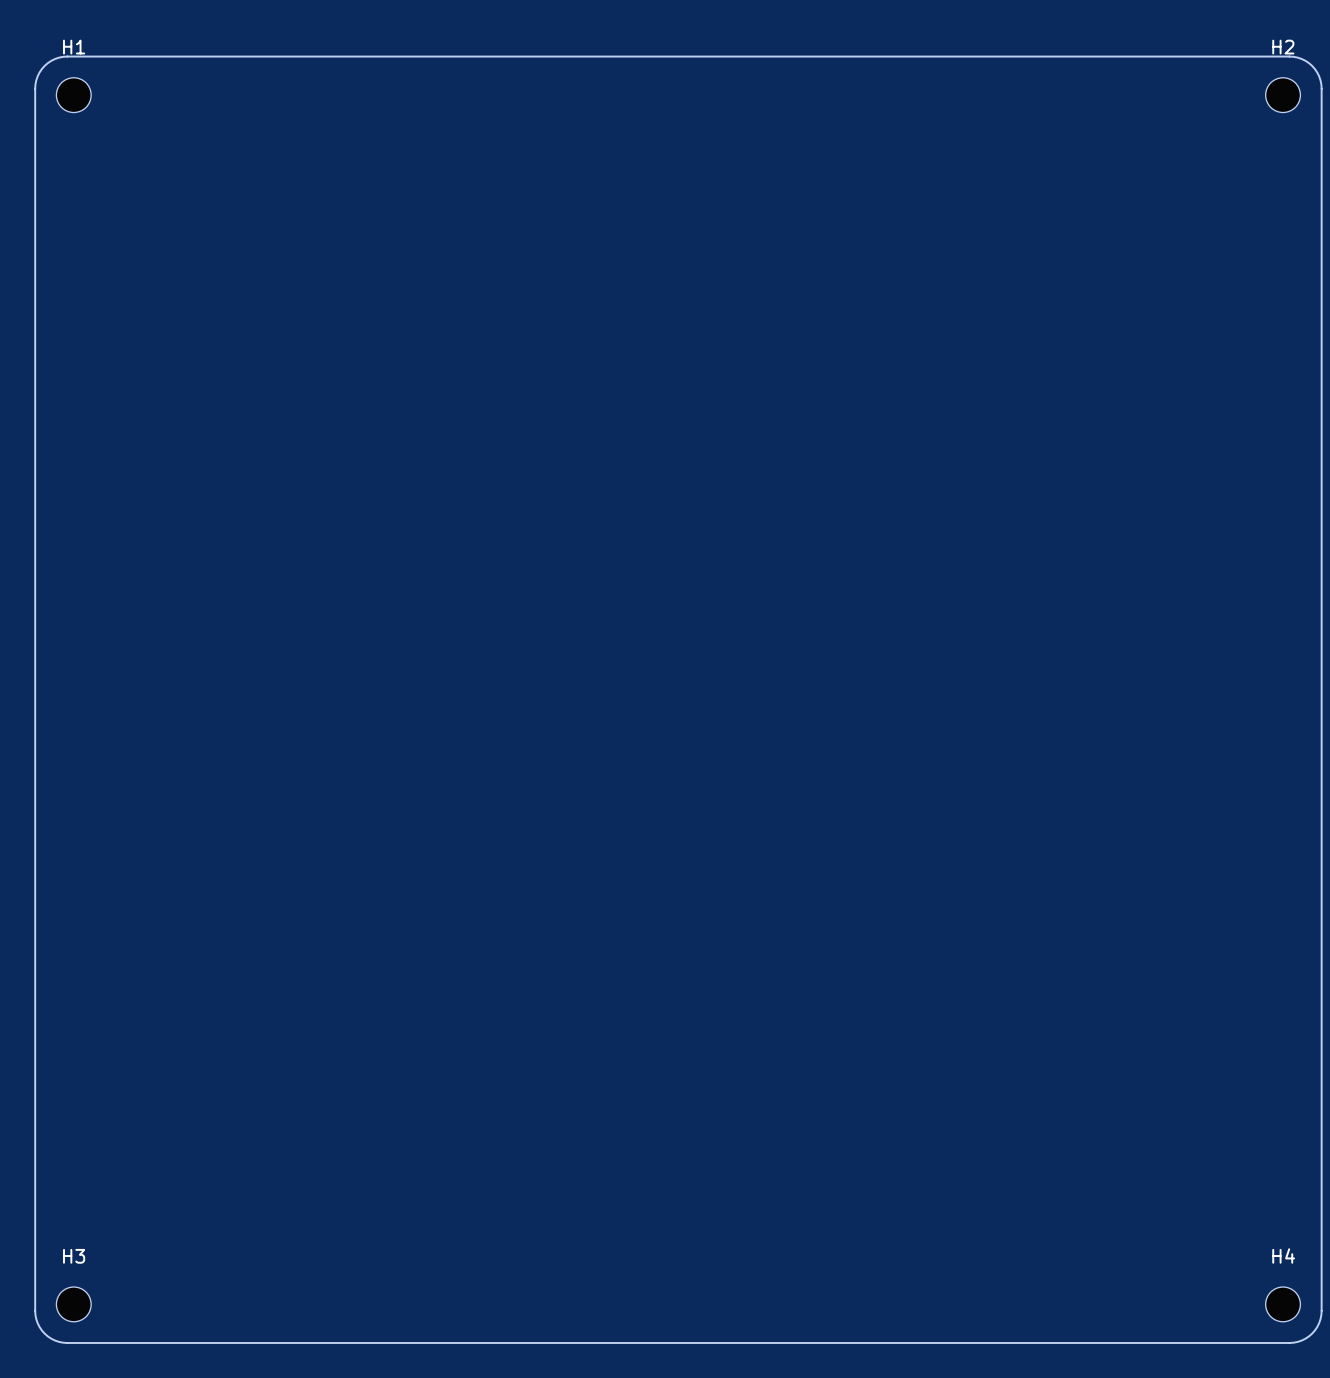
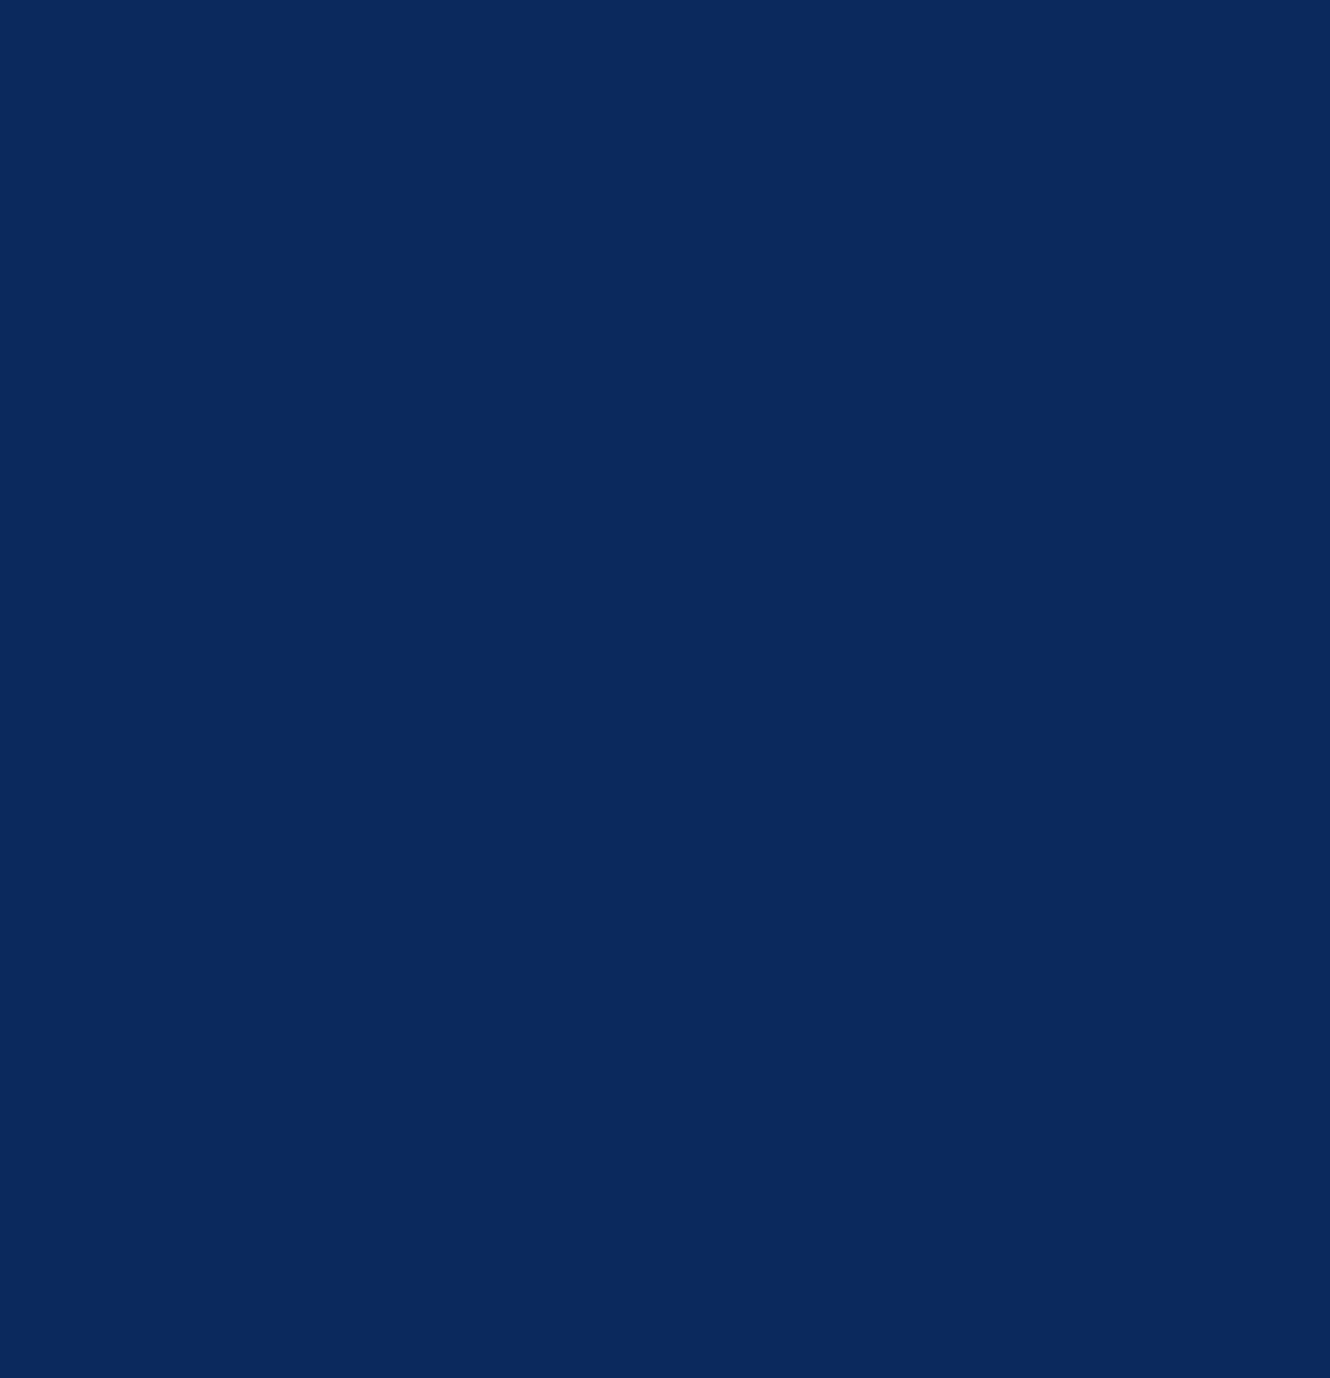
board edge: (67, 56) (1289, 56) (1301, 58) (1312, 65) (1319, 76) (1321, 88) (1321, 1310) (1319, 1323) (1312, 1333) (1301, 1340) (1289, 1342) (67, 1342) (55, 1340) (44, 1333) (37, 1323) (35, 1310) (35, 88) (37, 76) (44, 65) (55, 58) (67, 56) -> none
H1: (73, 95) -> none
H2: (1283, 95) -> none
H3: (73, 1304) -> none
H4: (1283, 1304) -> none

